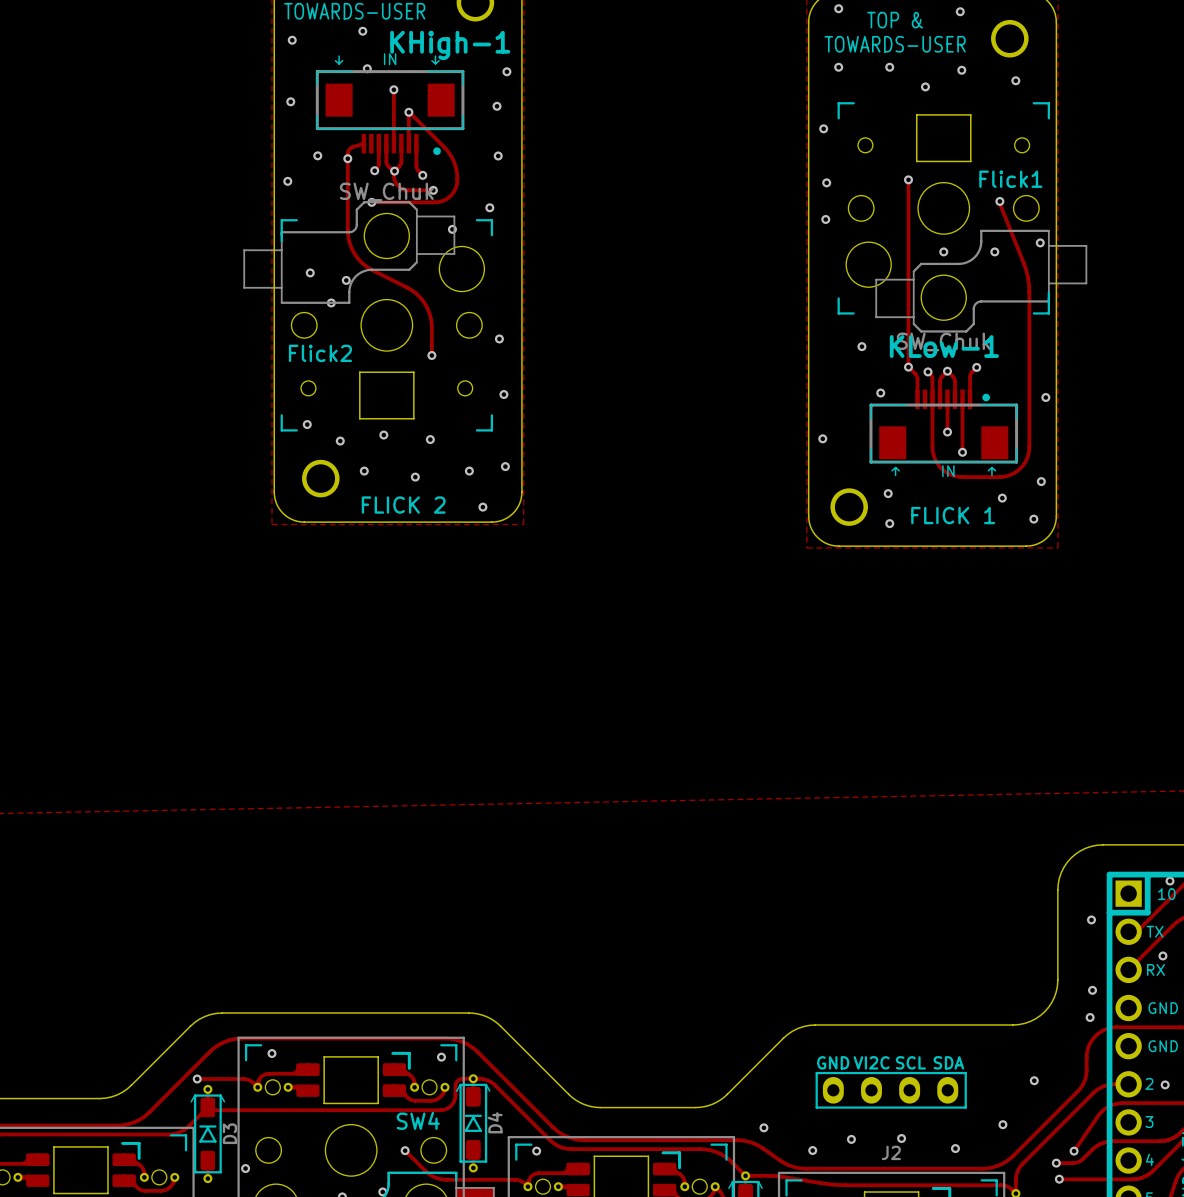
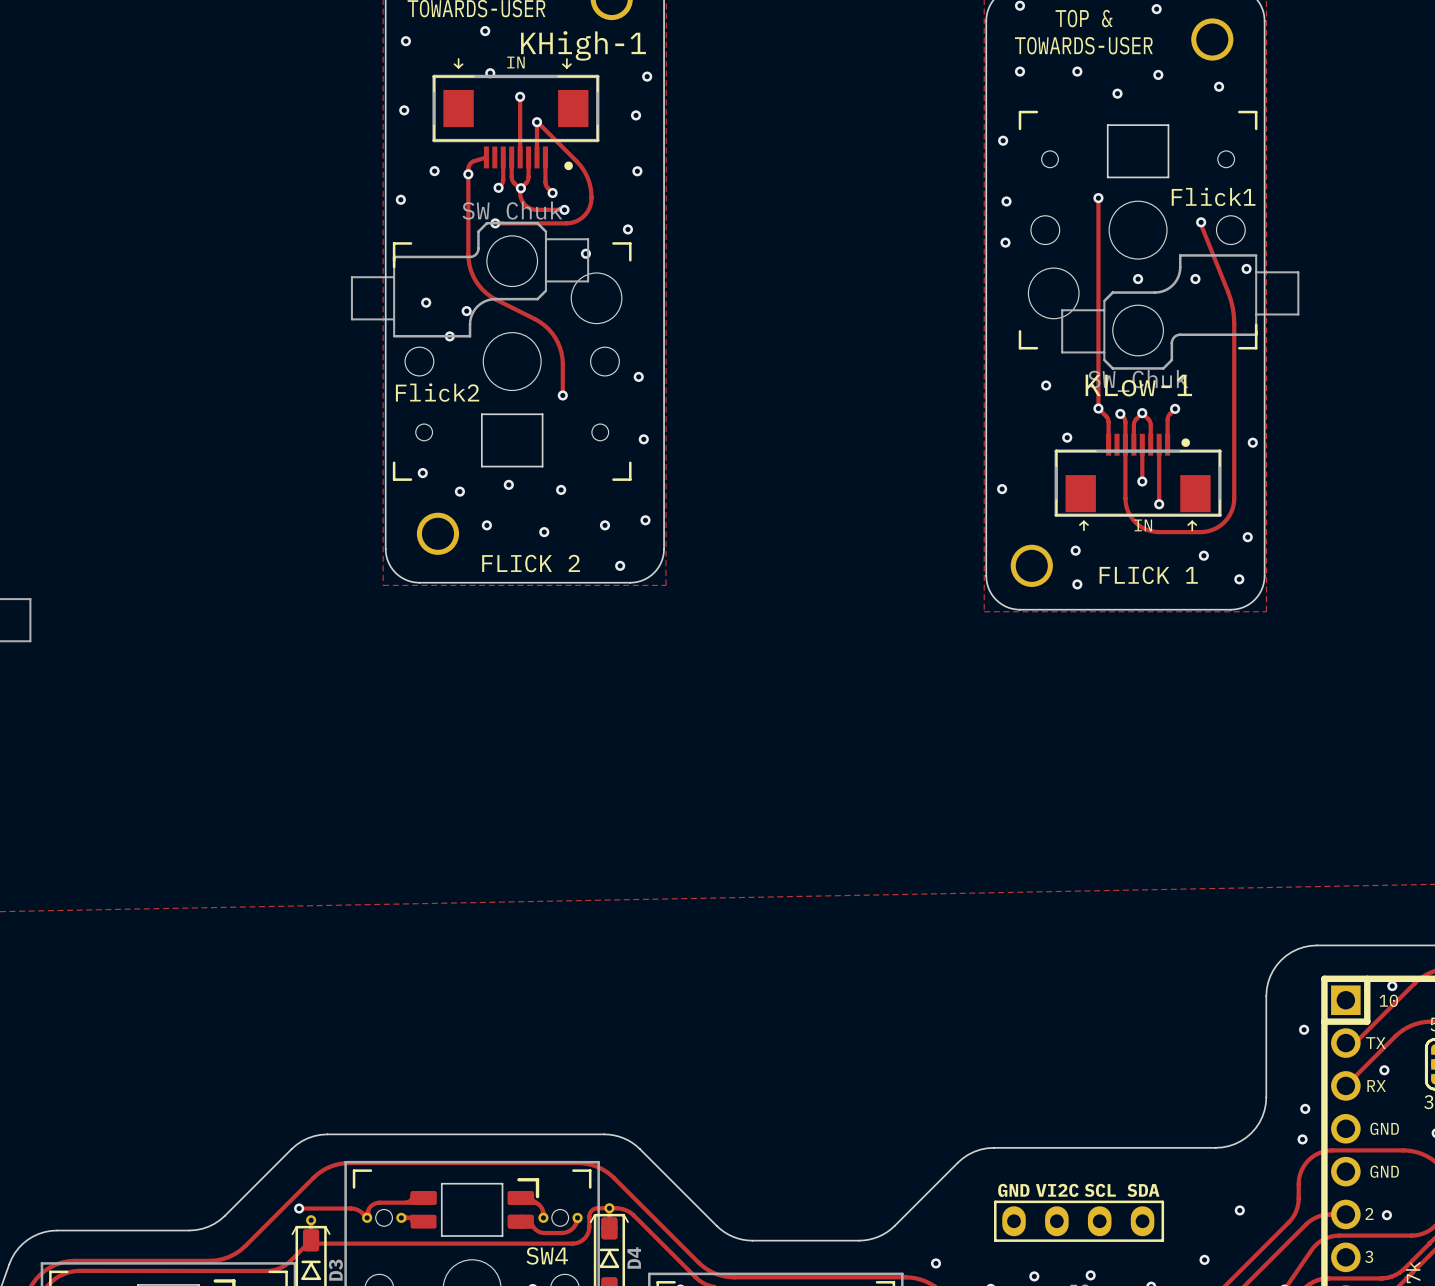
via: (271, 1053) -> none
via: (441, 1057) -> none

